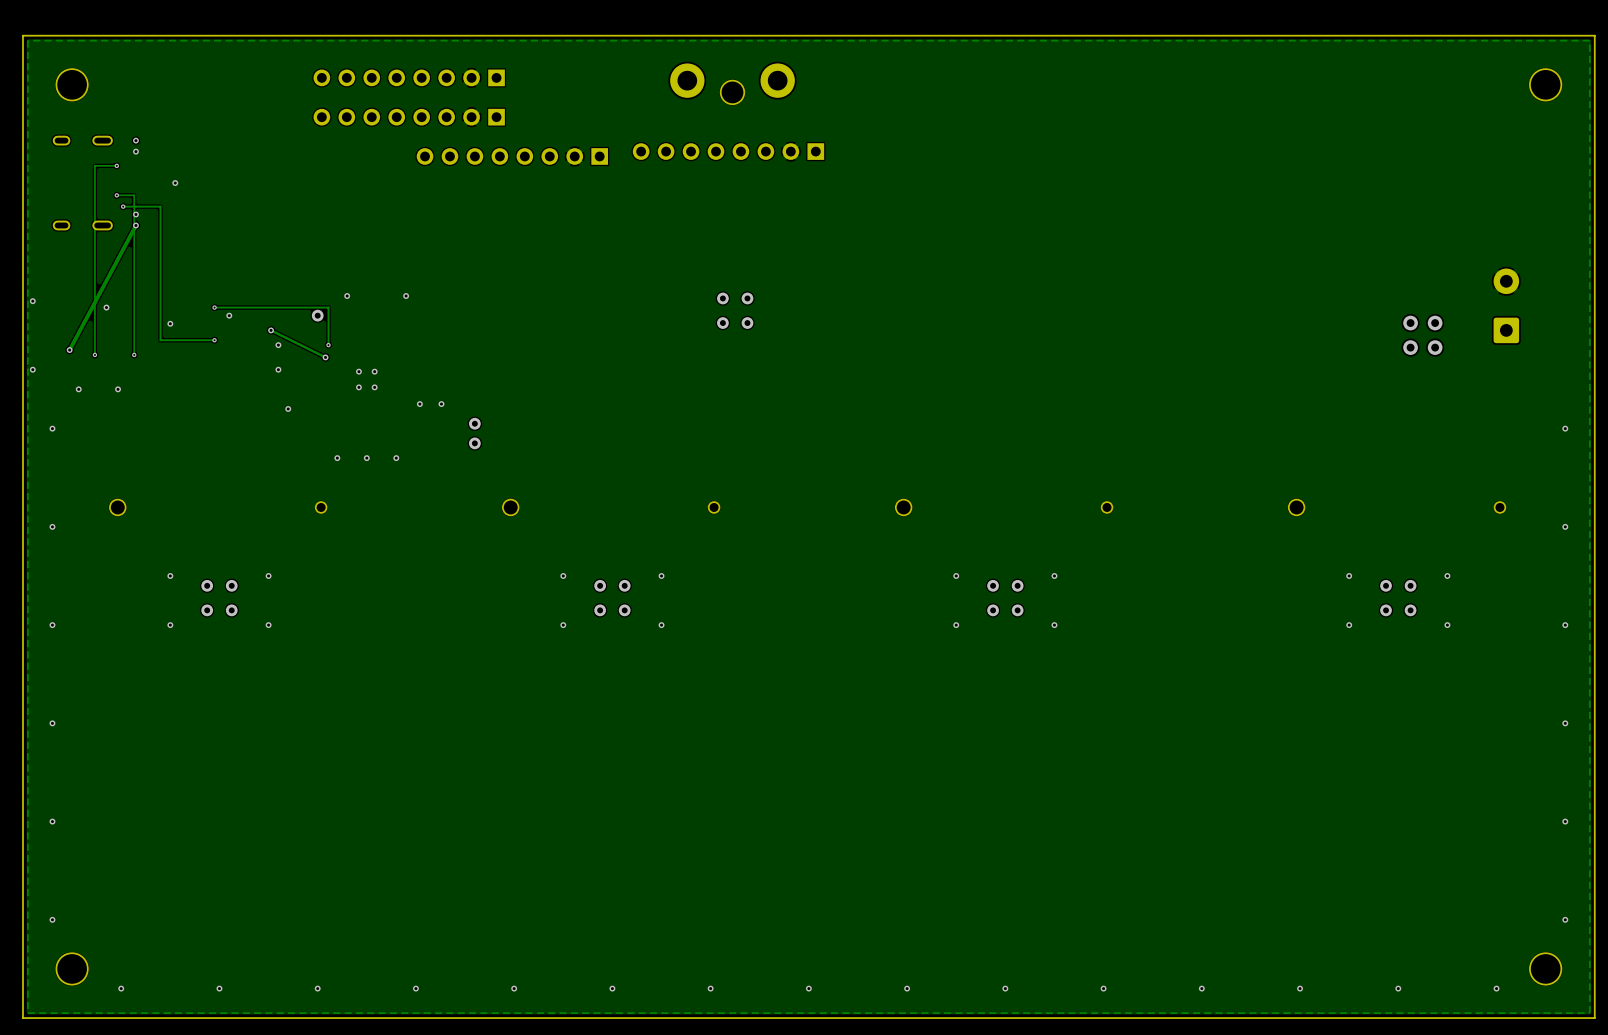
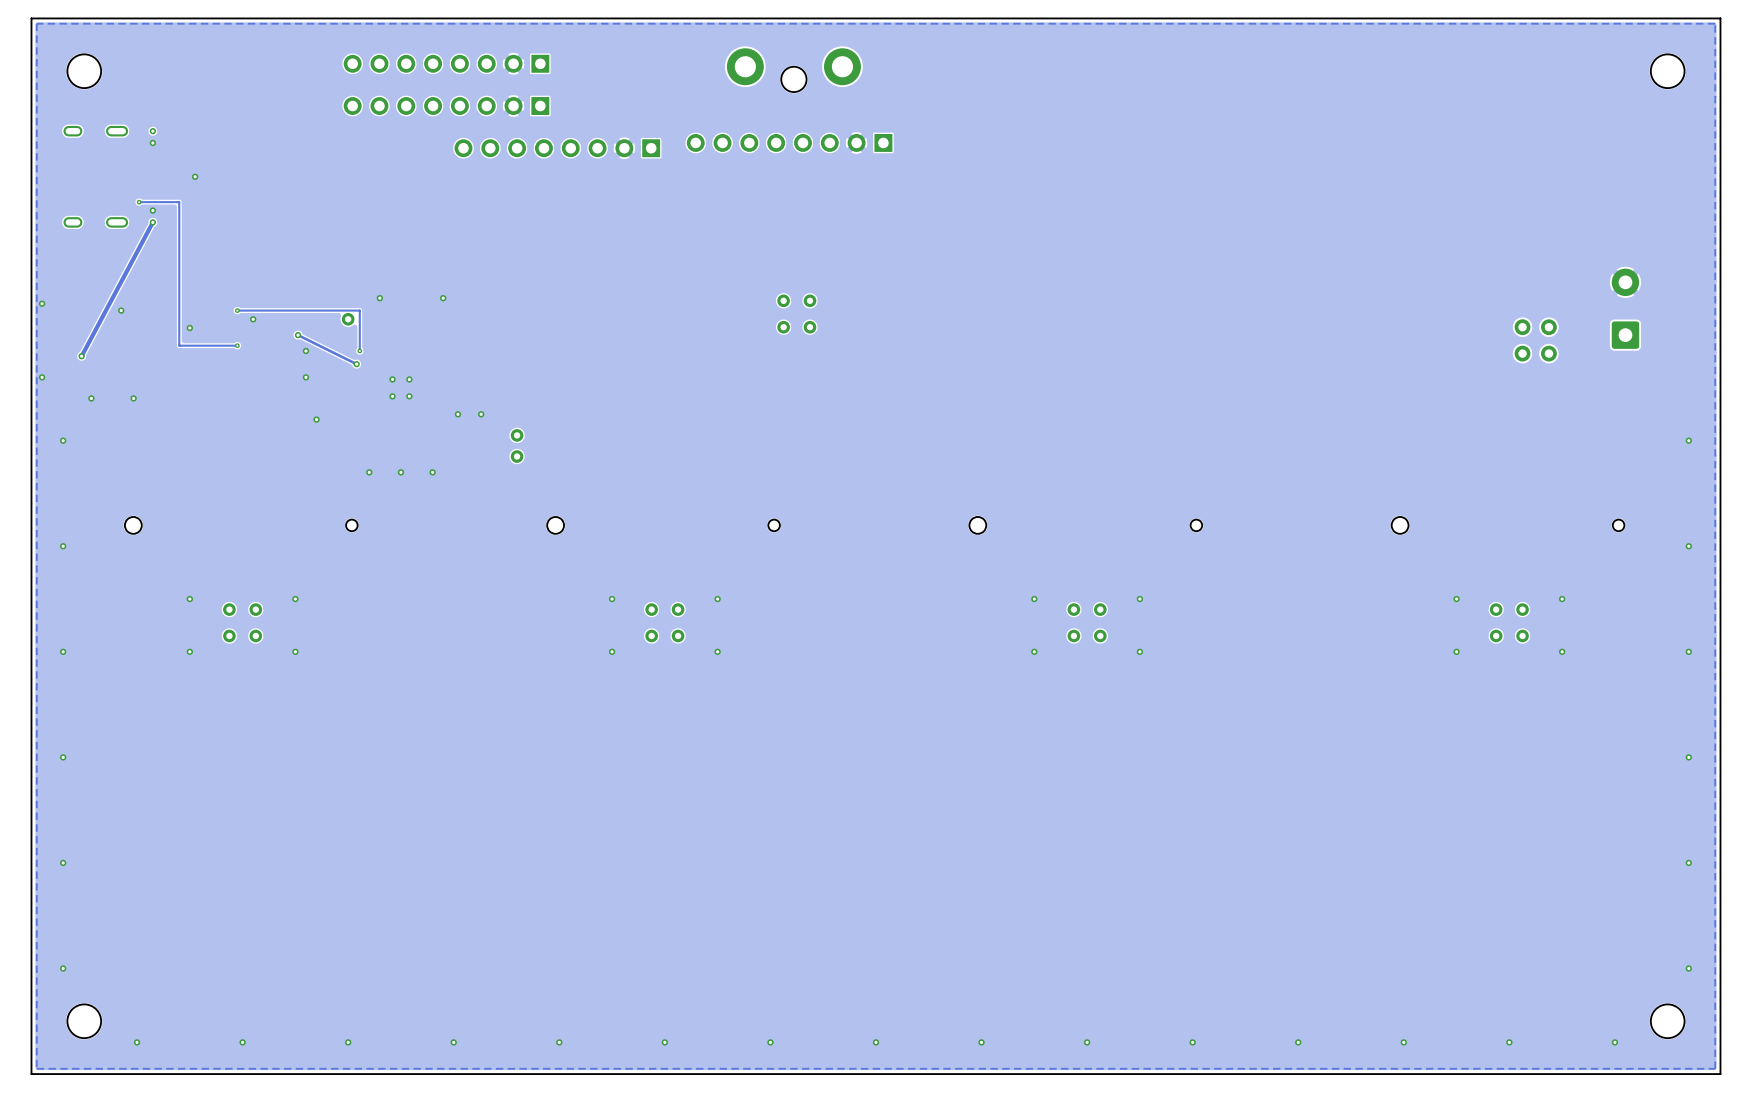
track: (116, 165) (94, 165) (94, 354) -> none
via: (116, 165) -> none
track: (116, 195) (134, 195) (134, 354) -> none
via: (116, 195) -> none
via: (94, 354) -> none
via: (134, 354) -> none

